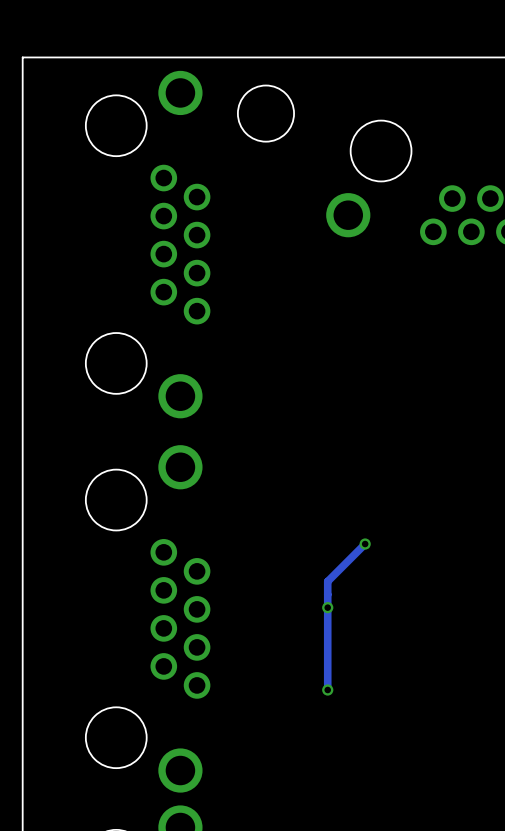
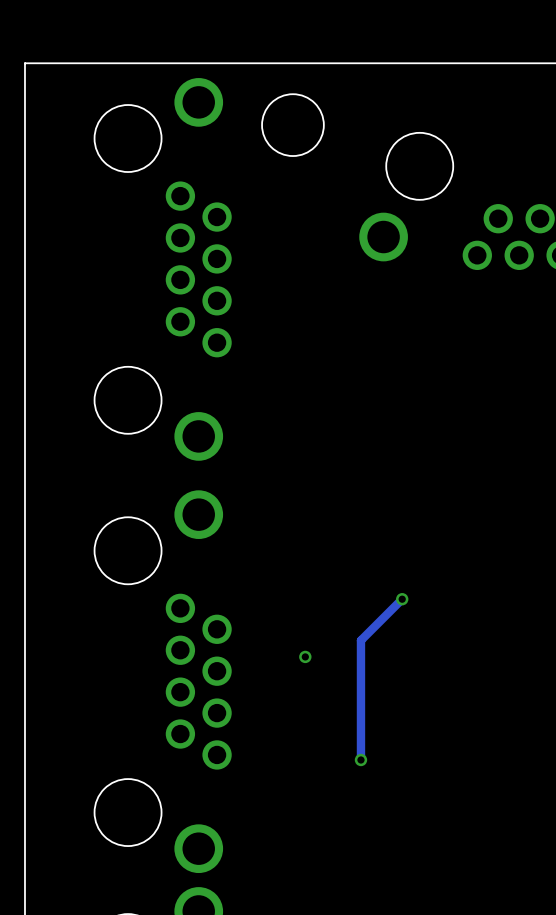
via position: (327, 607) -> (305, 656)

